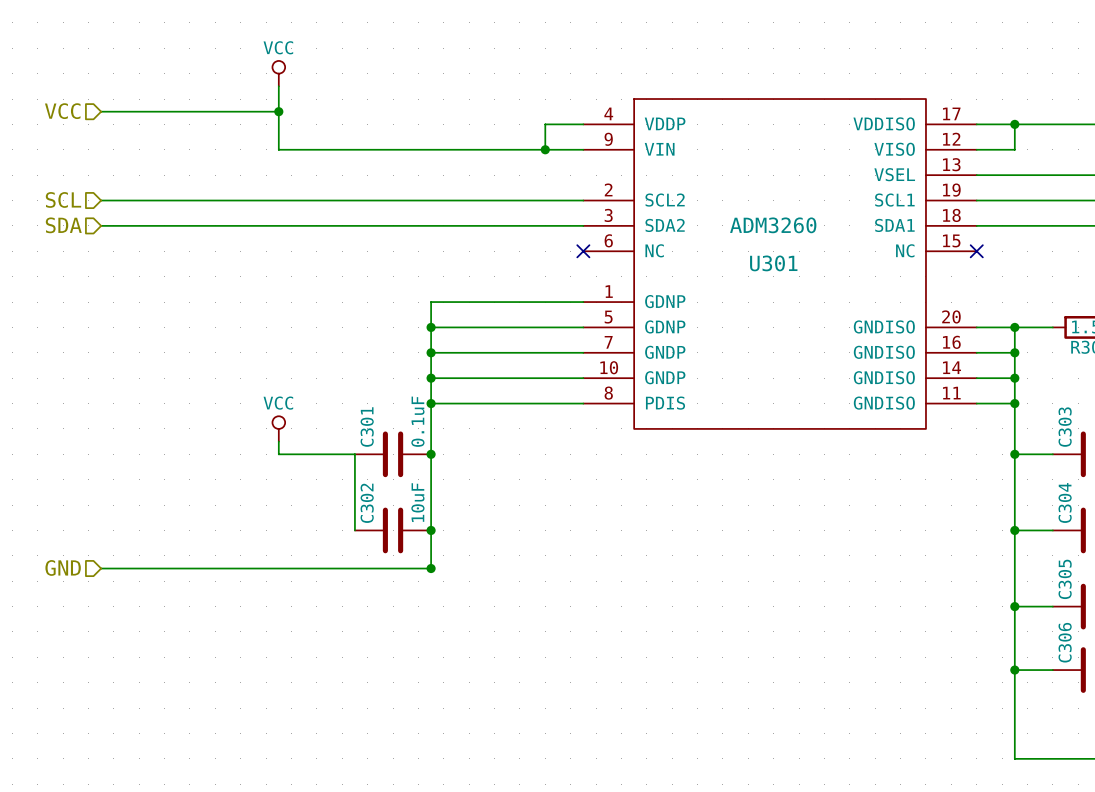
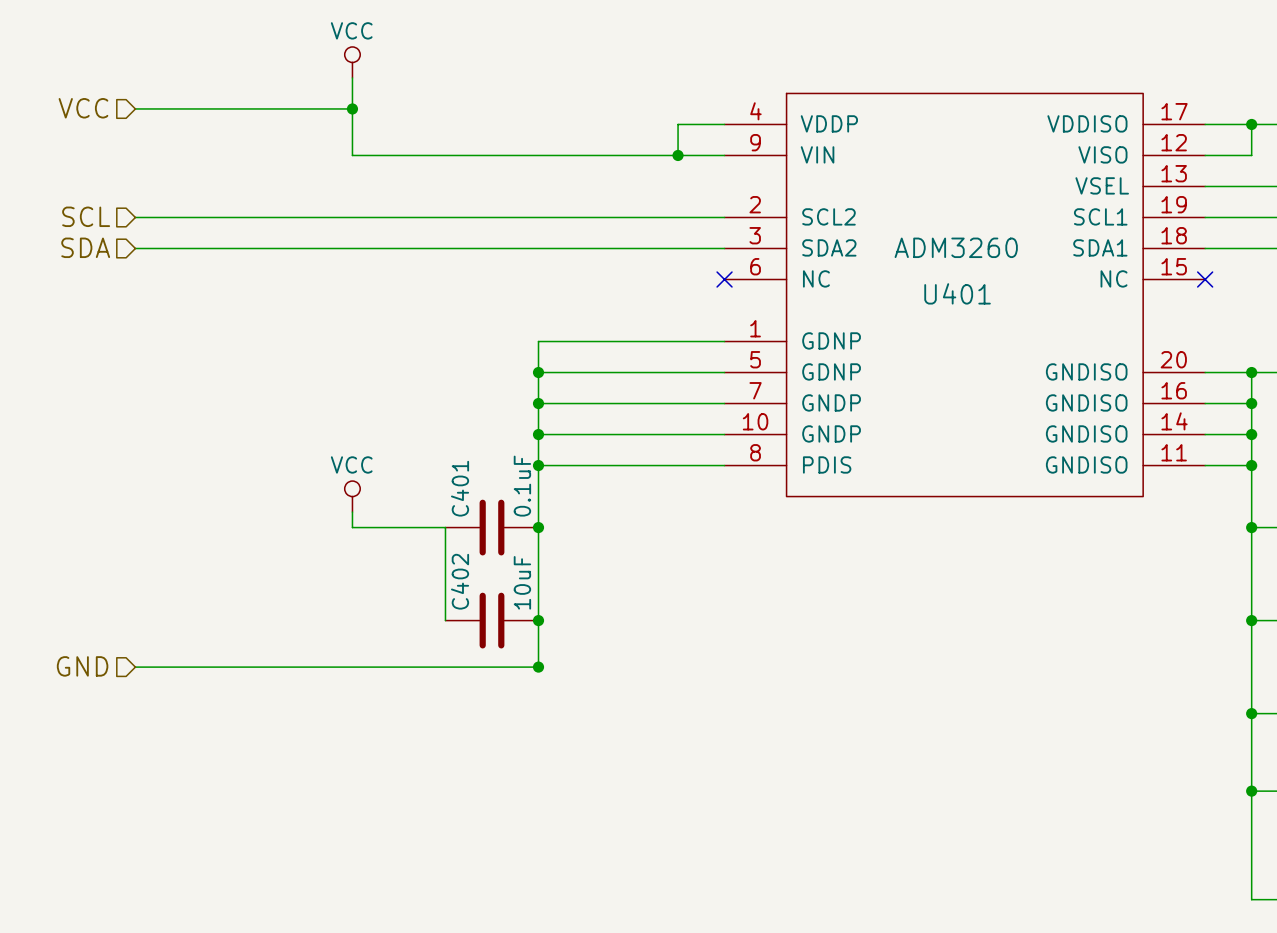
U301 name: U301 (773, 263) -> U401 (957, 293)
C301 name: C301 (367, 427) -> C401 (460, 488)
C302 name: C302 (367, 503) -> C402 (460, 581)

